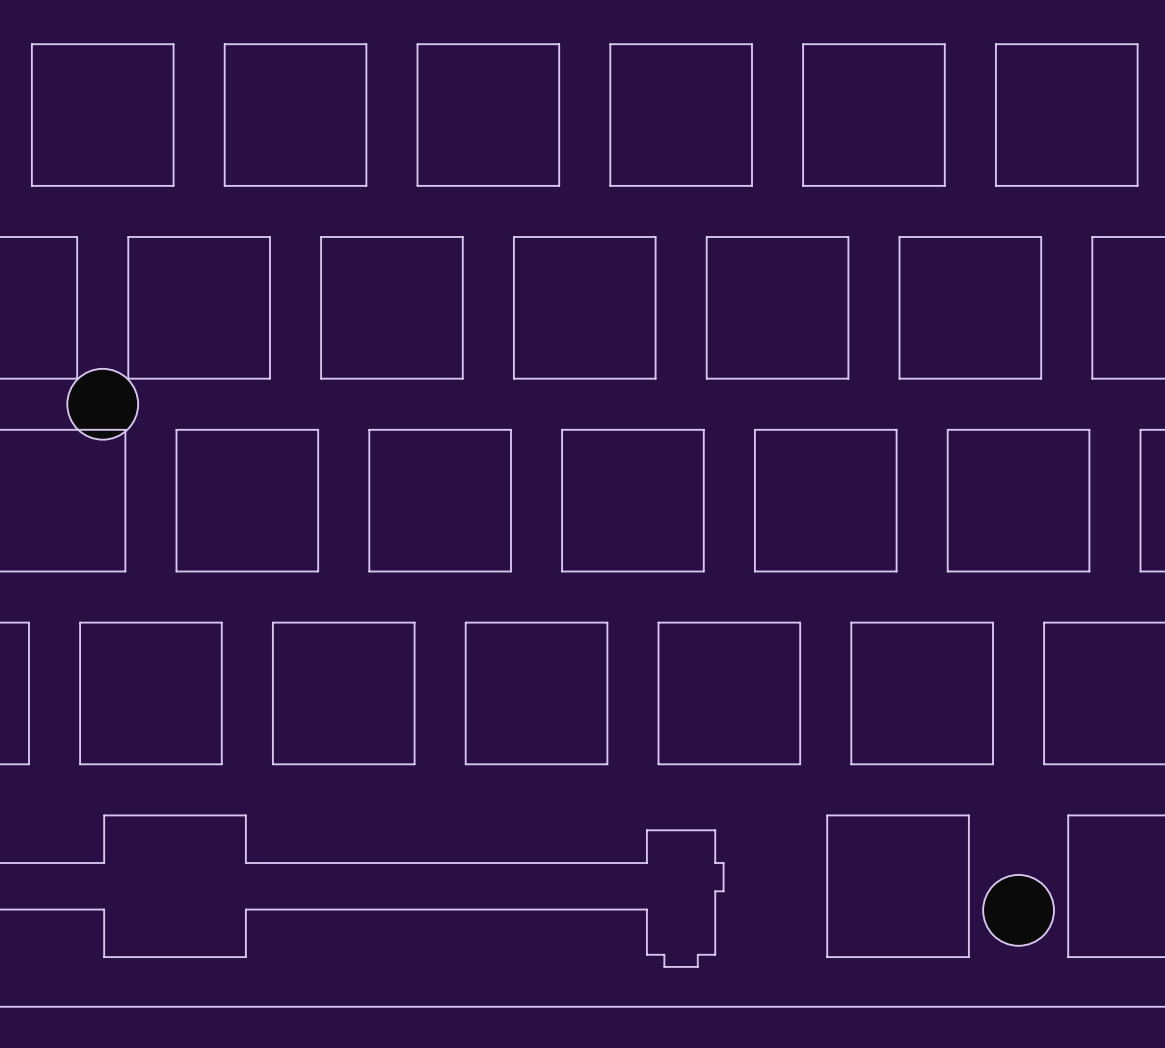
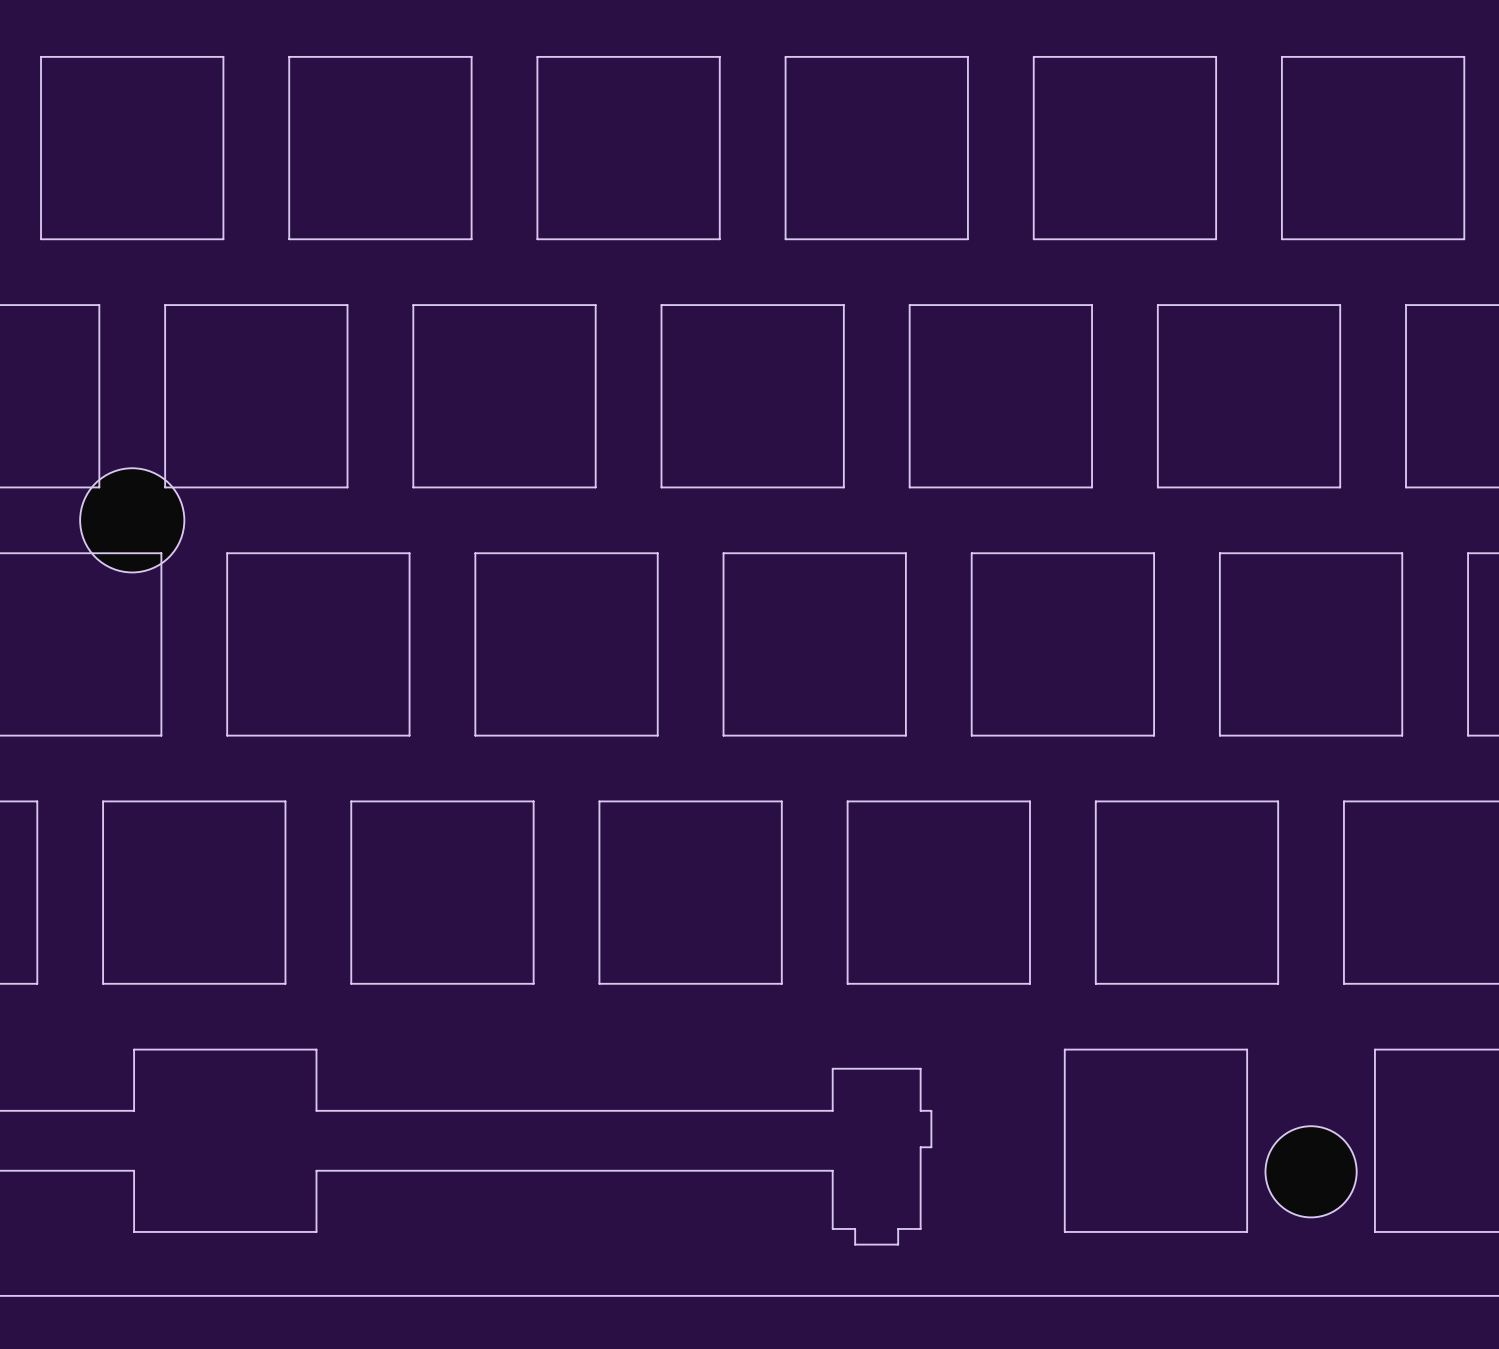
part footprint: [67, 368, 139, 440] -> [80, 468, 185, 573]

